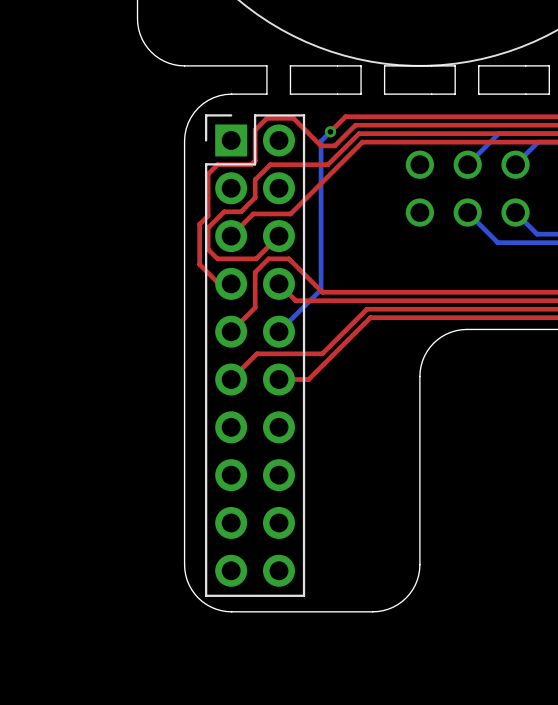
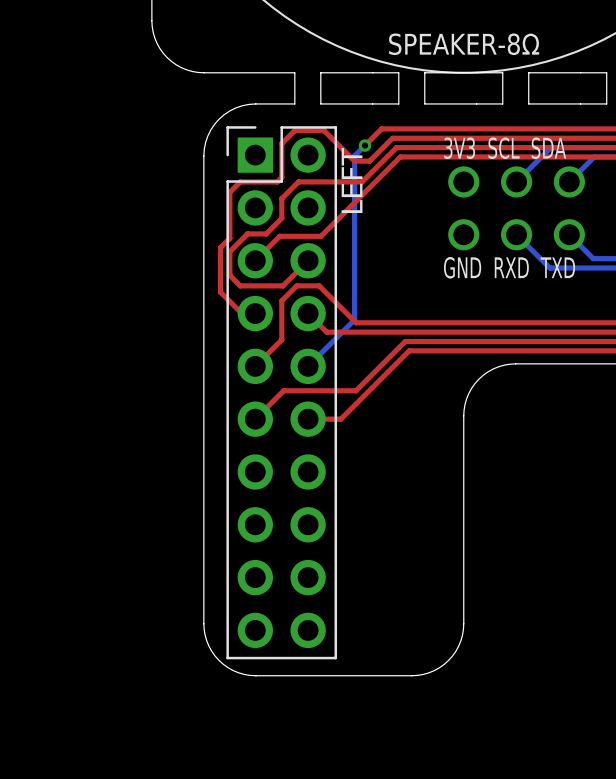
text: none -> SPEAKER-8Ω (464, 44)
text: none -> 3V3 SCL SDA (505, 148)
text: none -> LEFT (352, 180)
text: none -> GND RXD TXD (509, 267)

